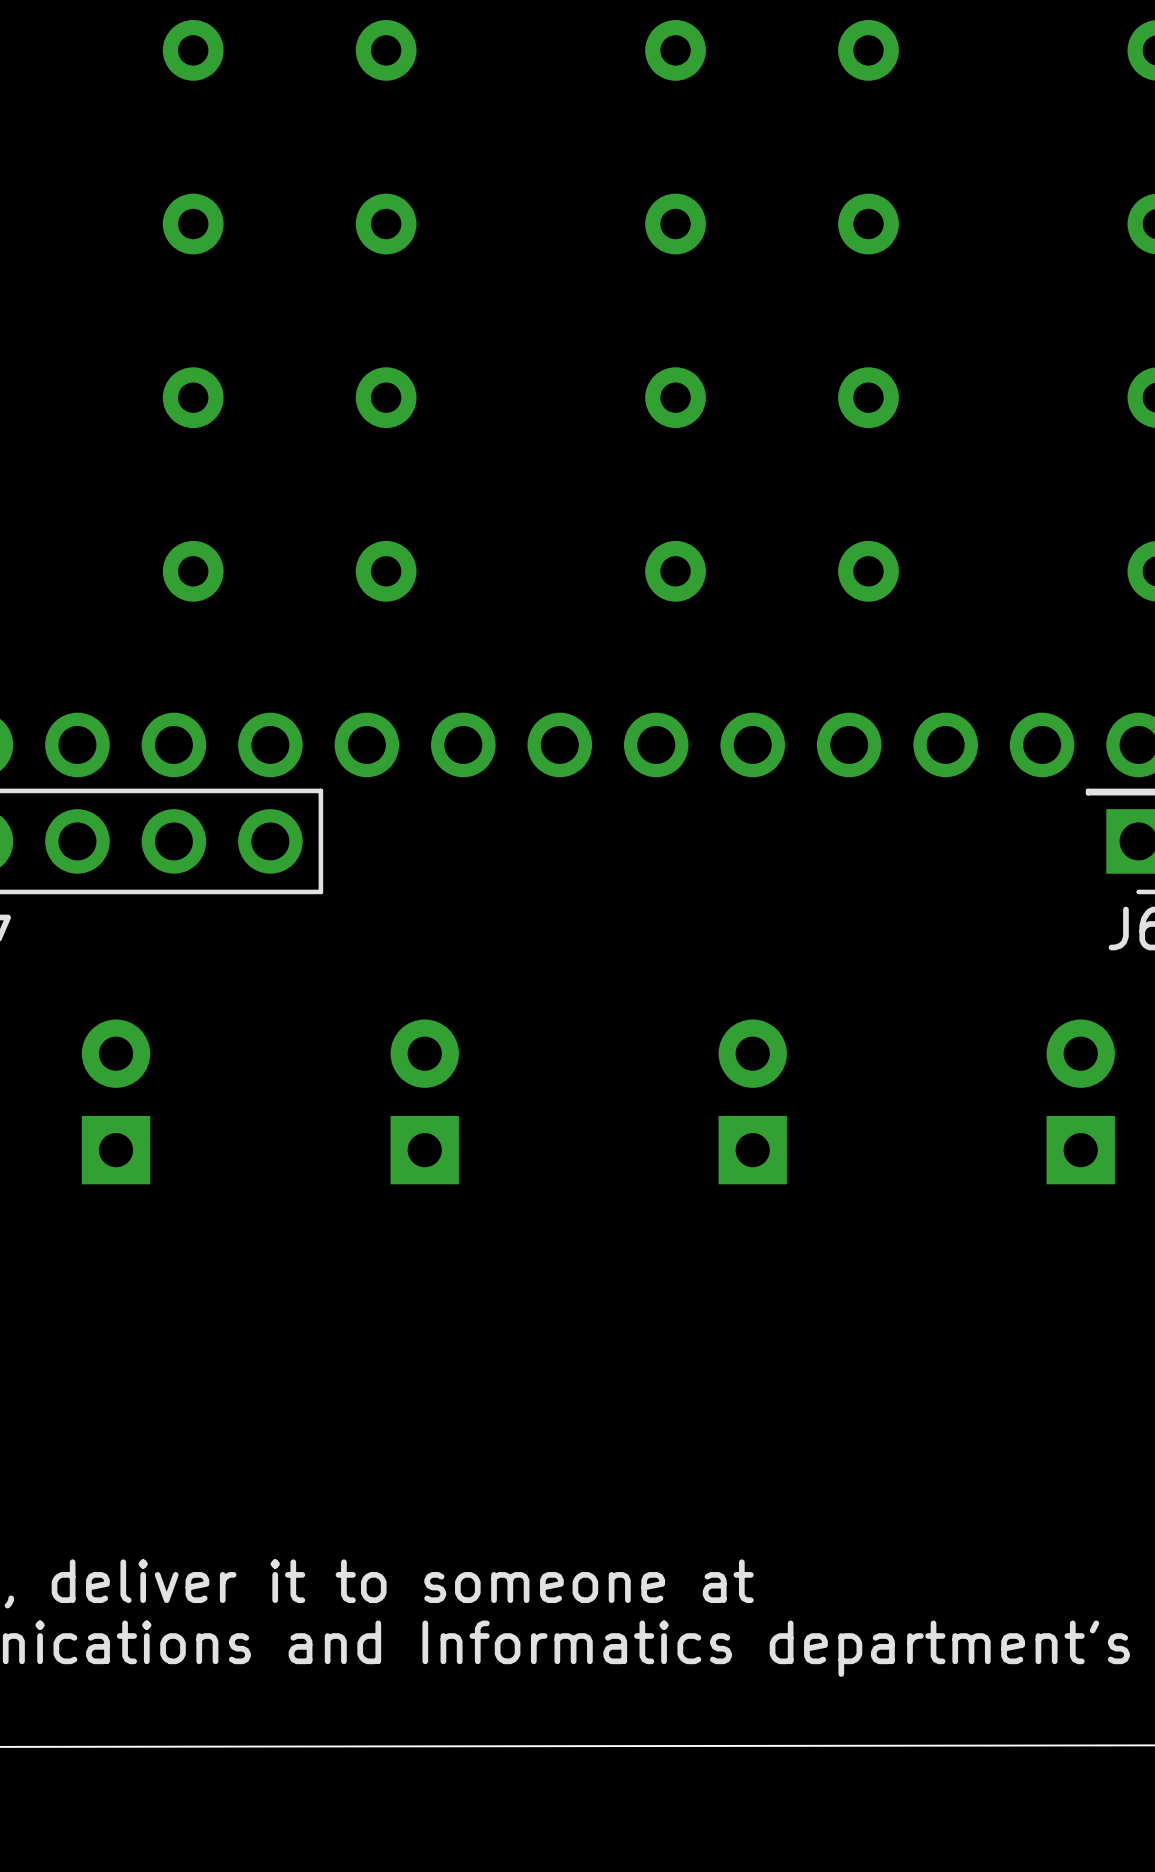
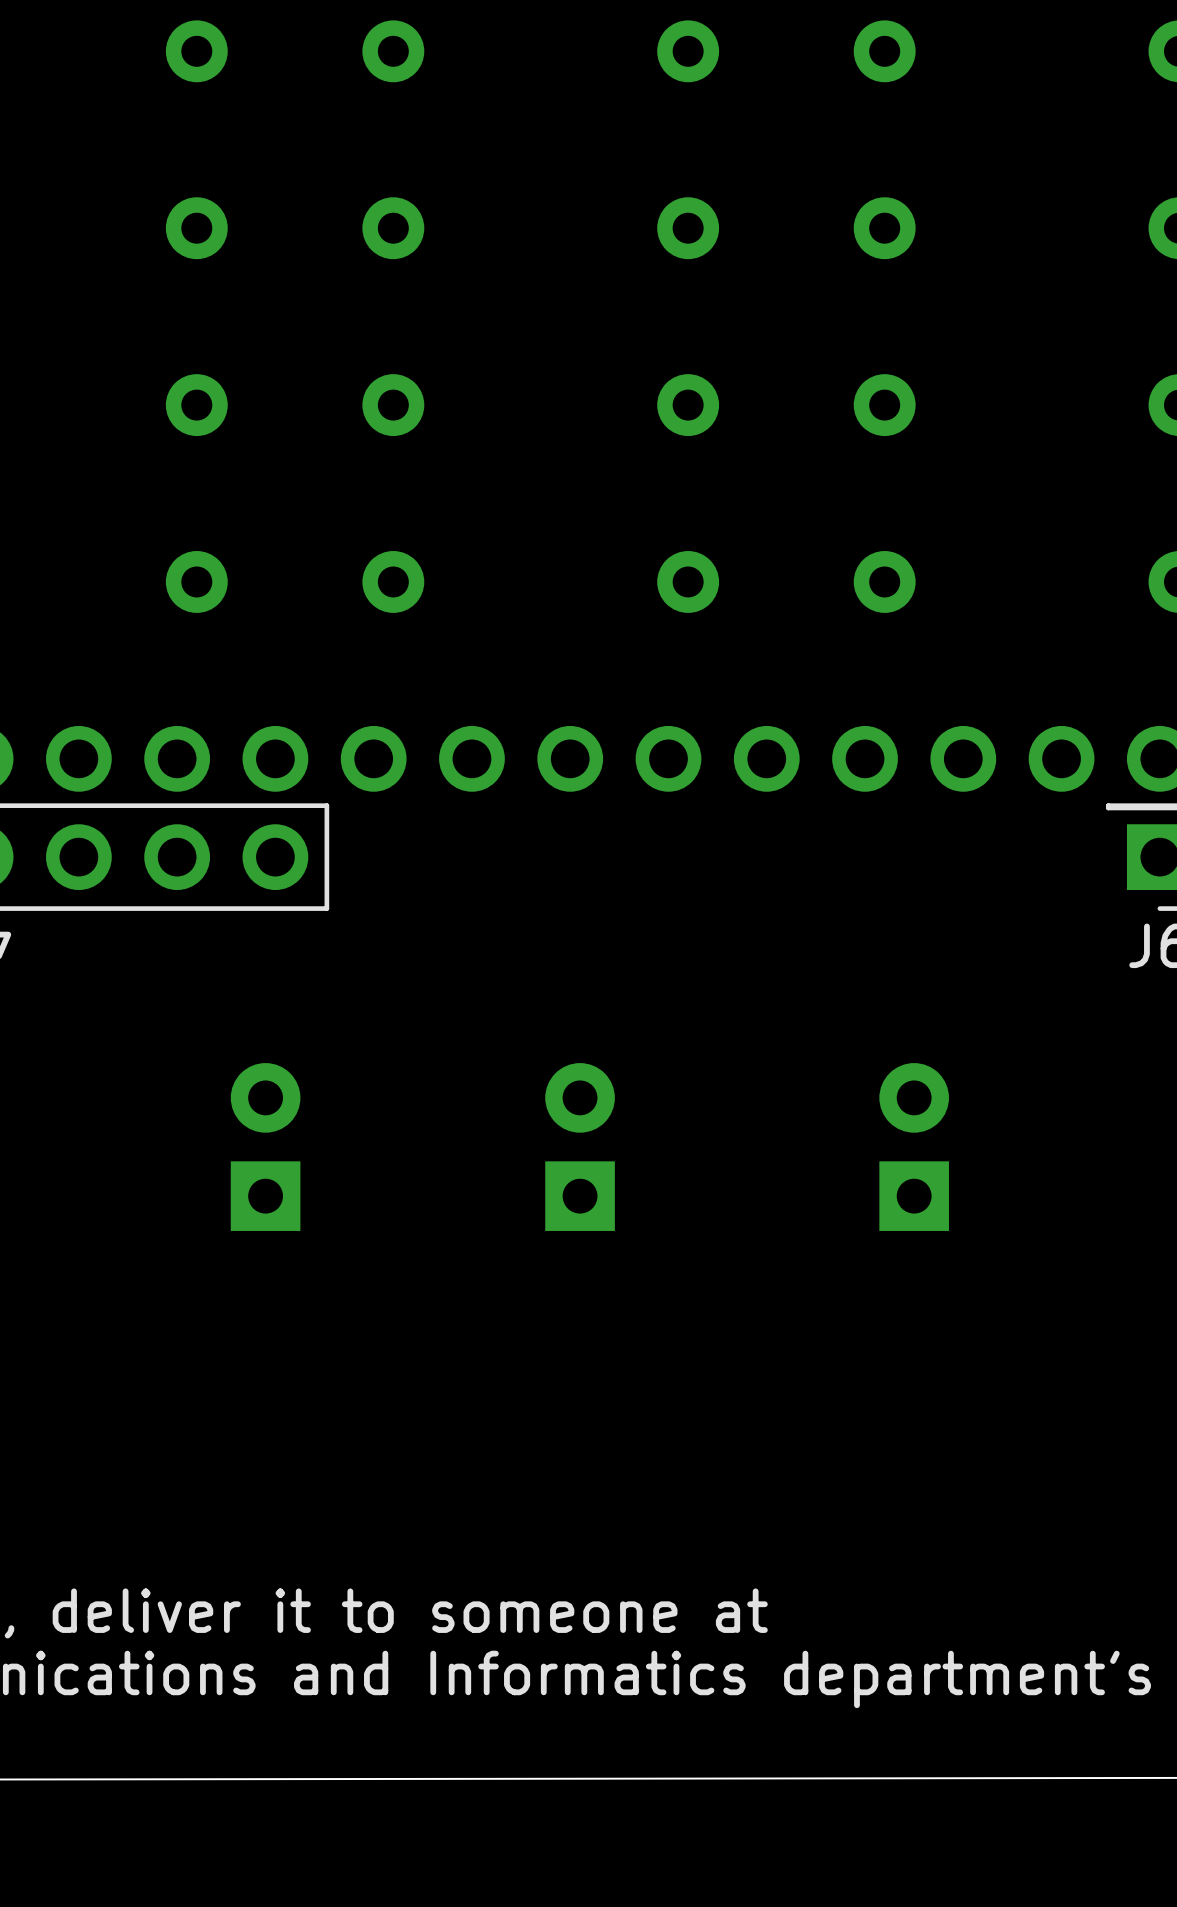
part: (116, 1101) -> none
part: (424, 1101) -> none
part: (752, 1101) -> none
part: (1080, 1101) -> none
part: none -> (265, 1147)
part: none -> (580, 1147)
part: none -> (914, 1147)

